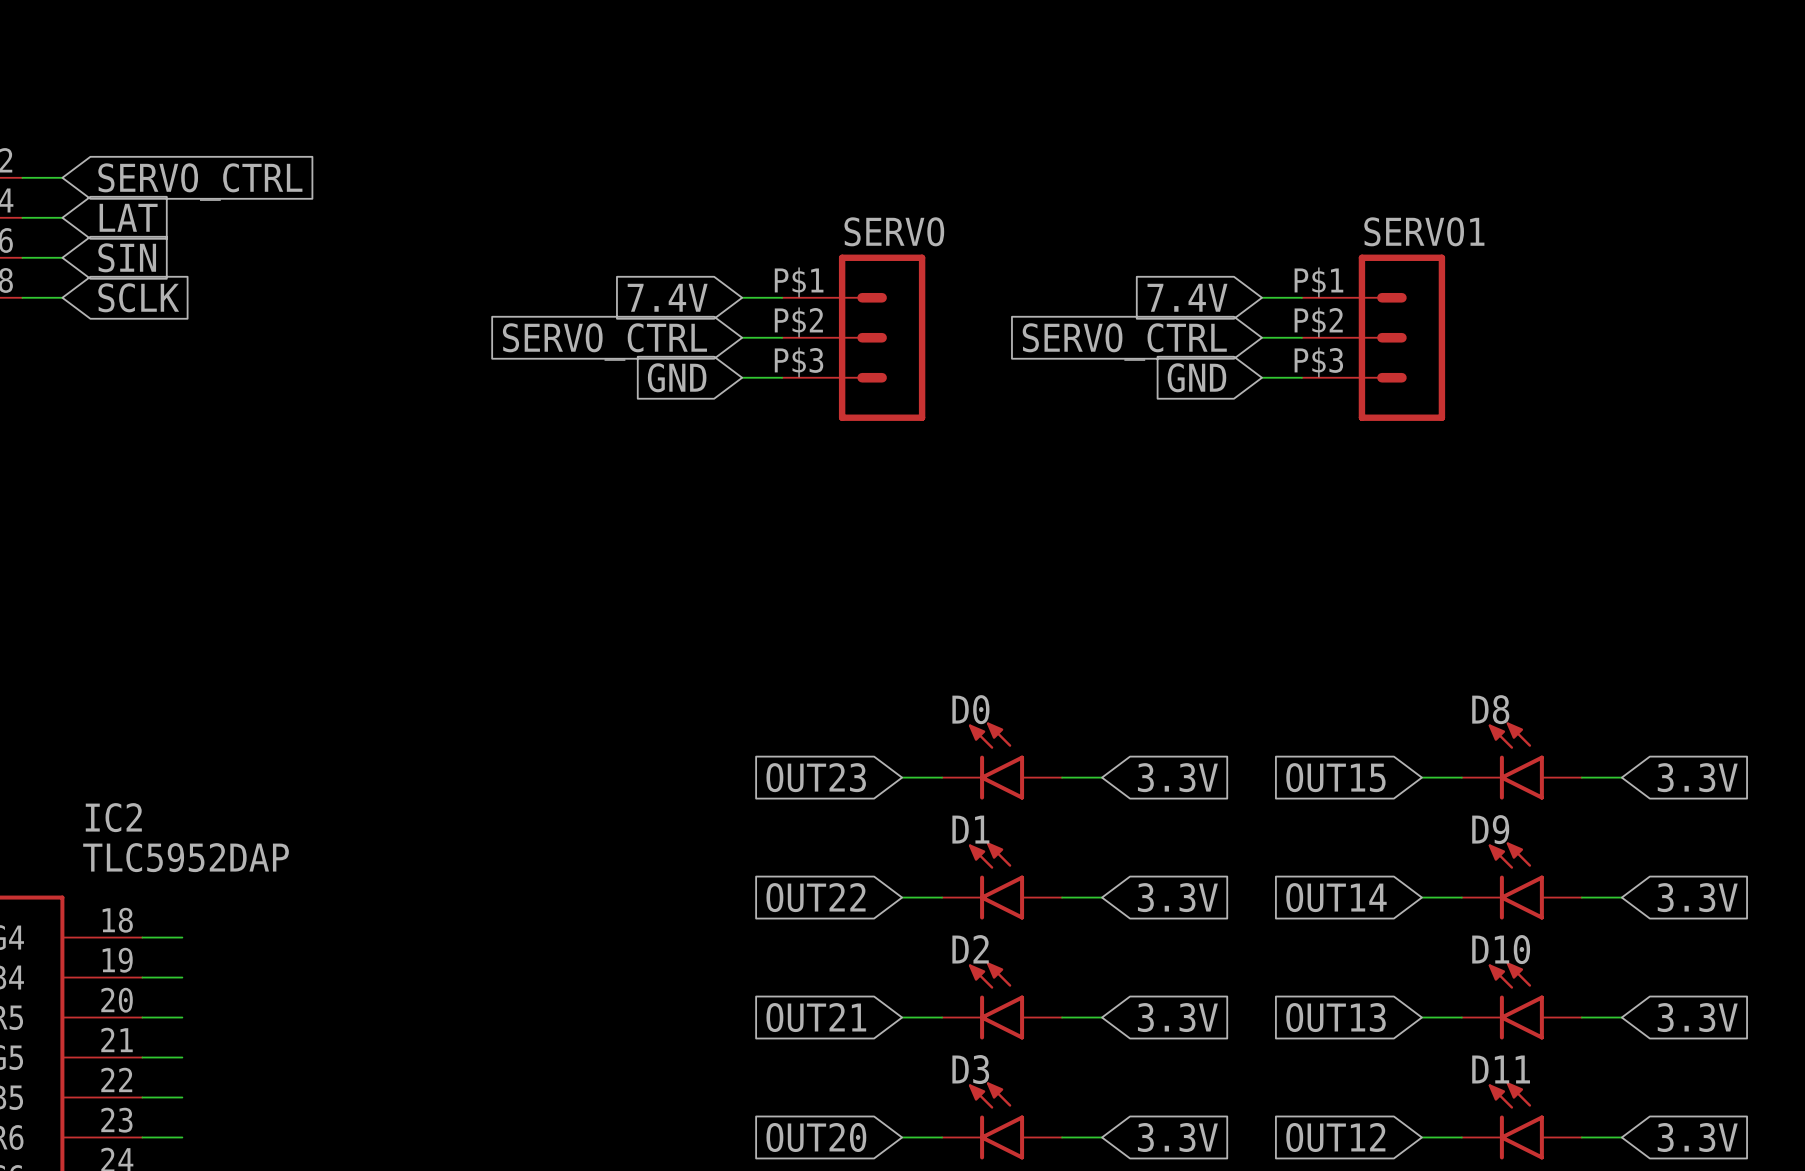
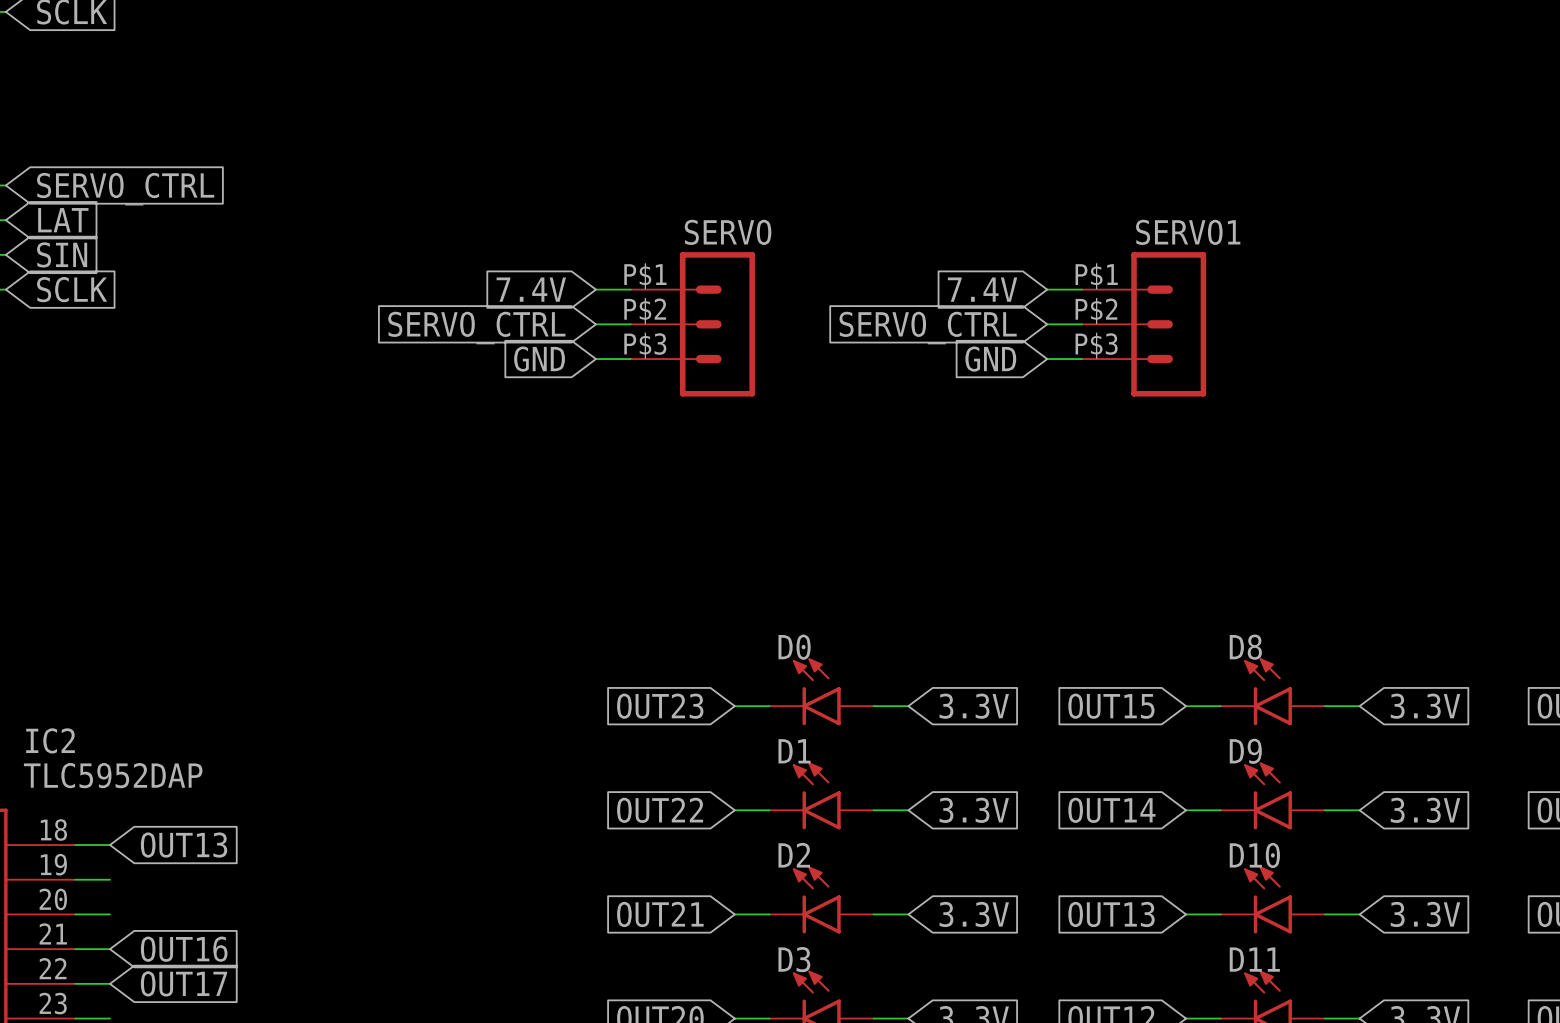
global label: none -> OUT13 (184, 845)
global label: none -> OUT16 (184, 949)
global label: none -> OUT17 (184, 983)

